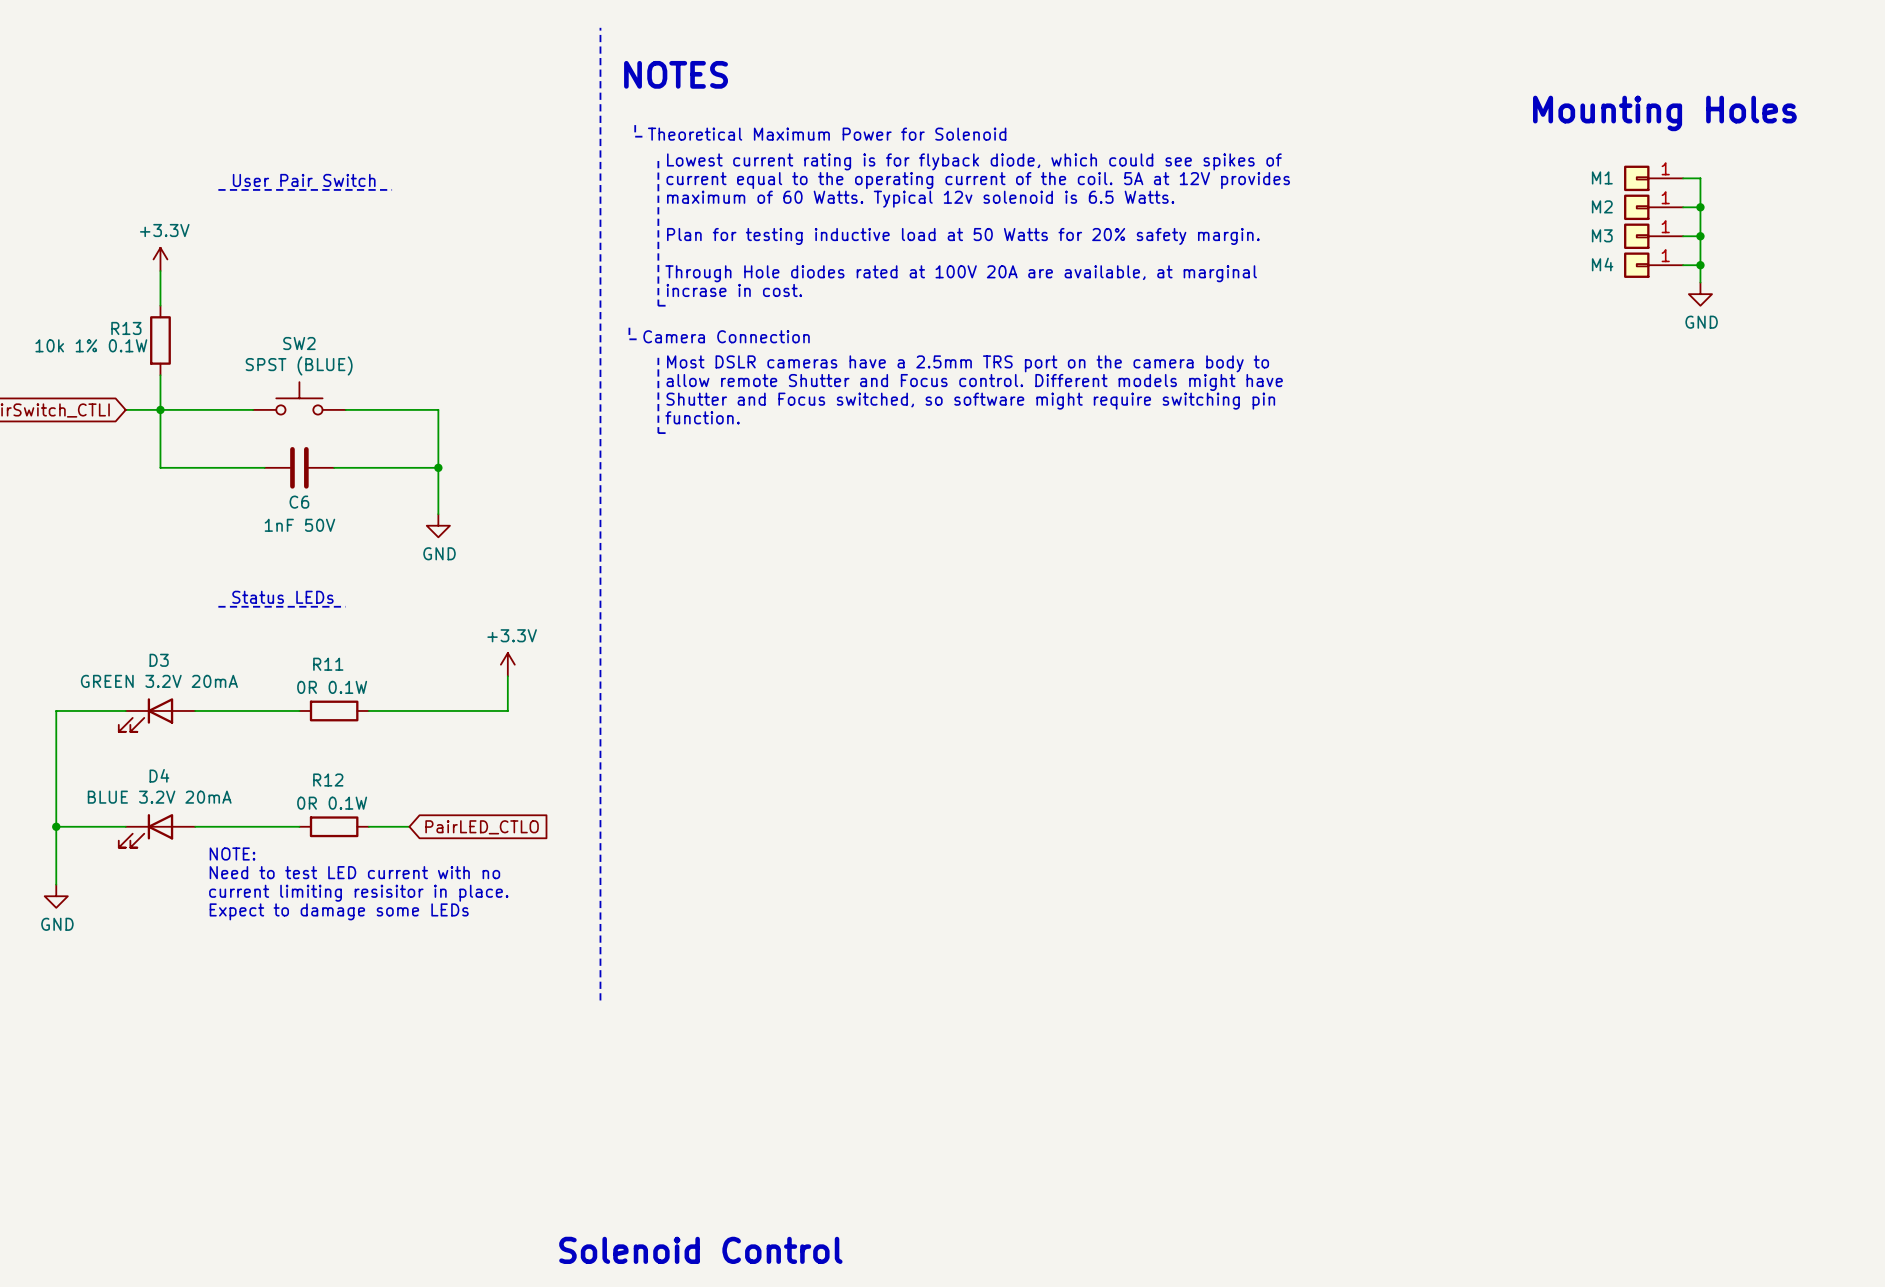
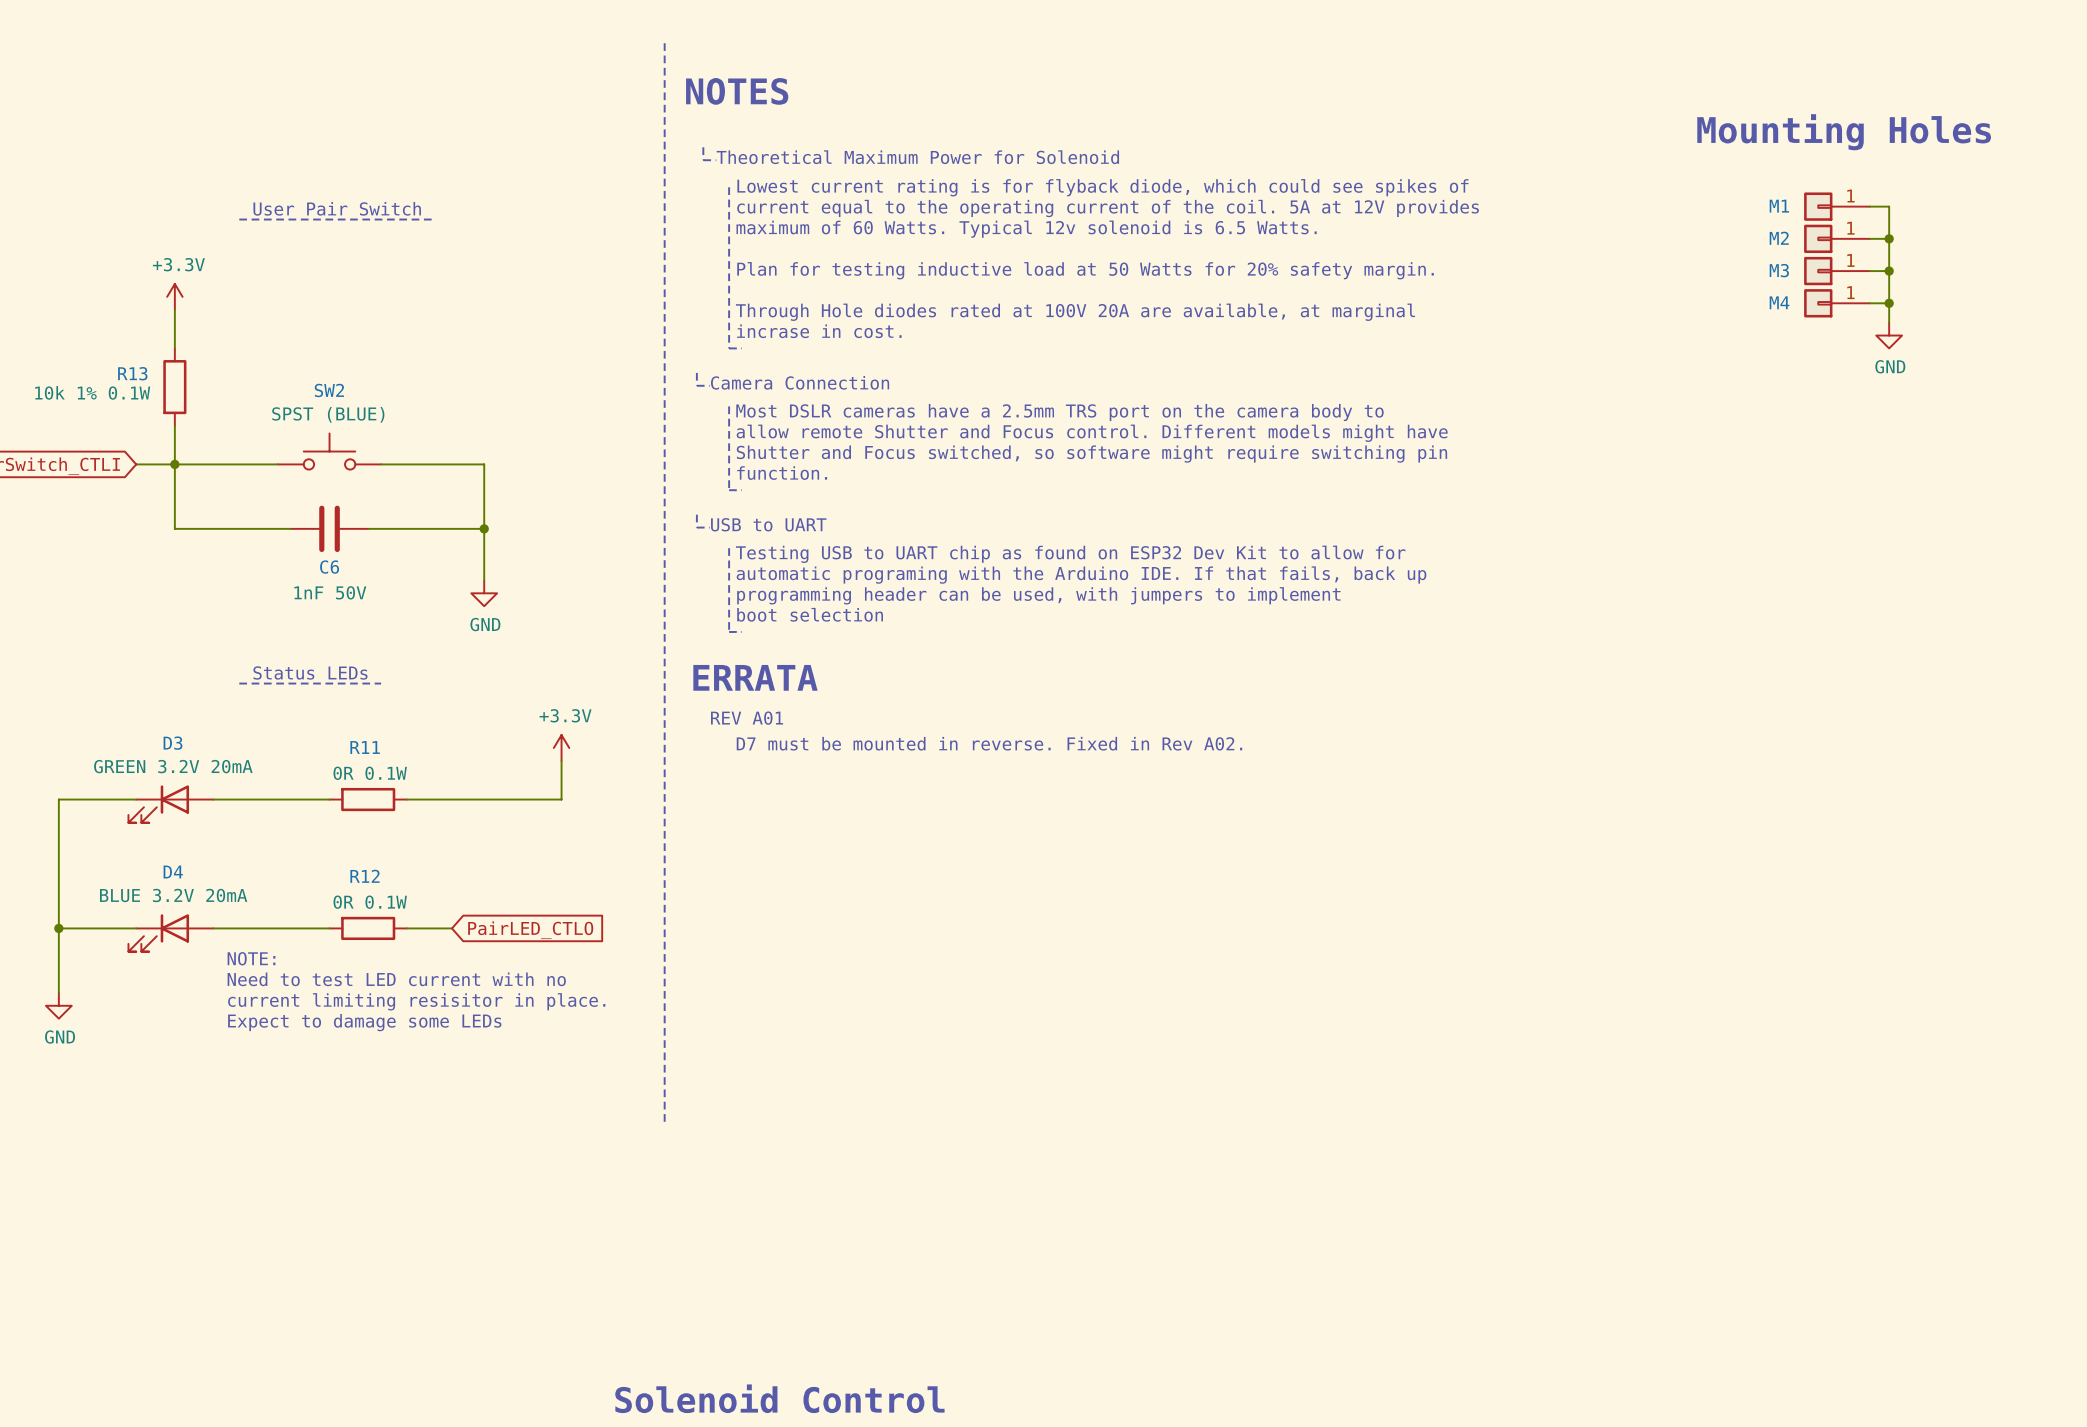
line: none -> (696, 514) (696, 527) (709, 527)
text: none -> USB to UART (768, 524)
line: none -> (729, 548) (729, 631) (742, 631)
text: none -> Testing USB to UART chip as found on ESP32 Dev Kit to allow for (1070, 554)
text: none -> automatic programing with the Arduino IDE. If that fails, back up (1081, 575)
text: none -> programming header can be used, with jumpers to implement (1038, 595)
text: none -> boot selection (810, 614)
text: none -> ERRATA (755, 677)
text: none -> REV A01 (747, 718)
text: none -> D7 must be mounted in reverse. Fixed in Rev A02. (989, 743)

